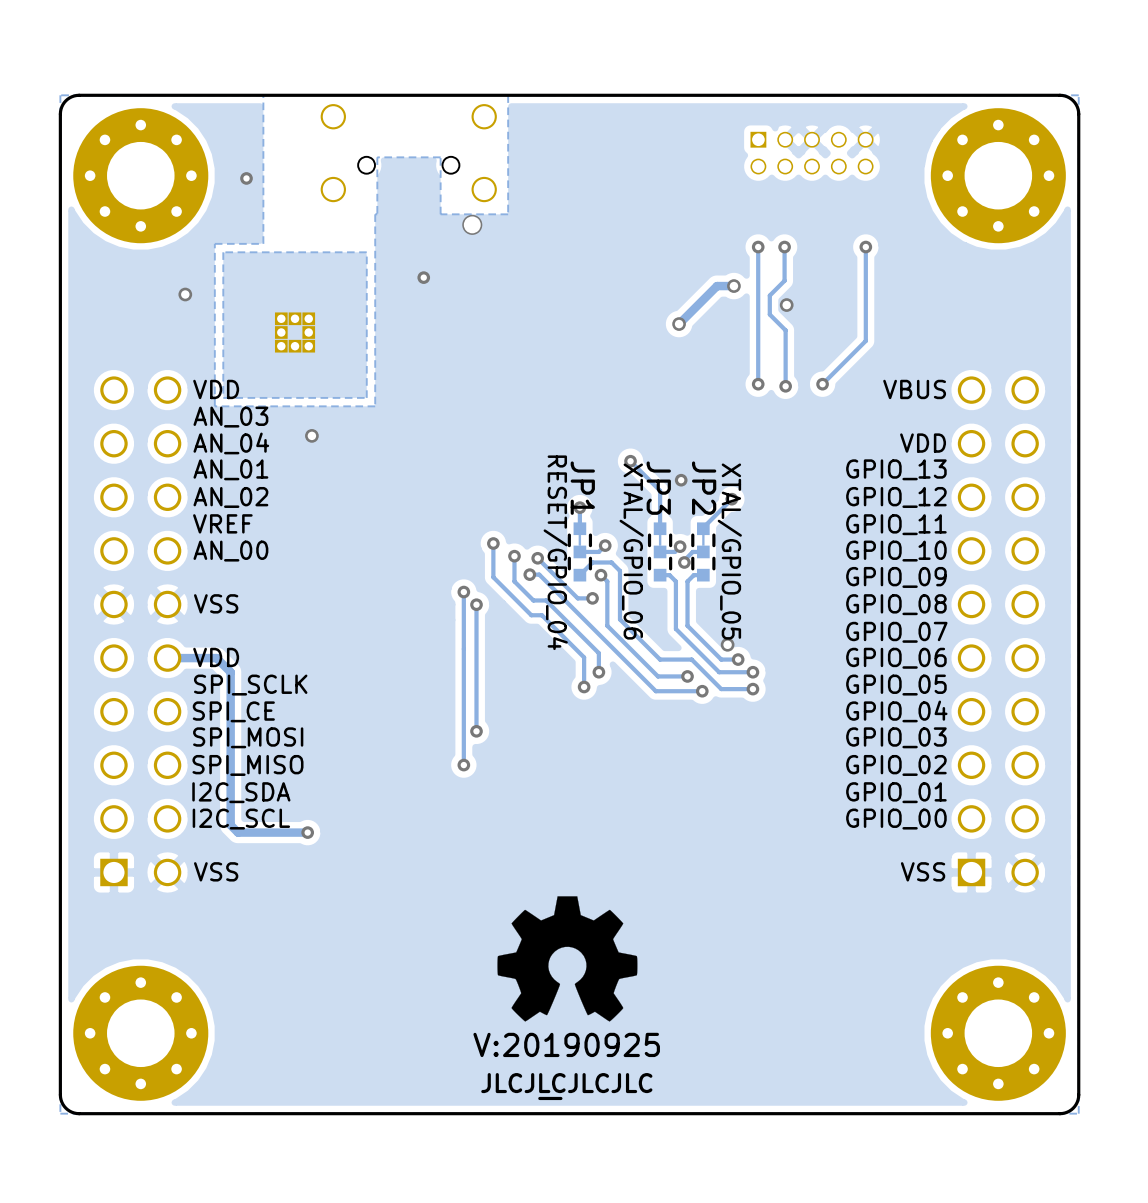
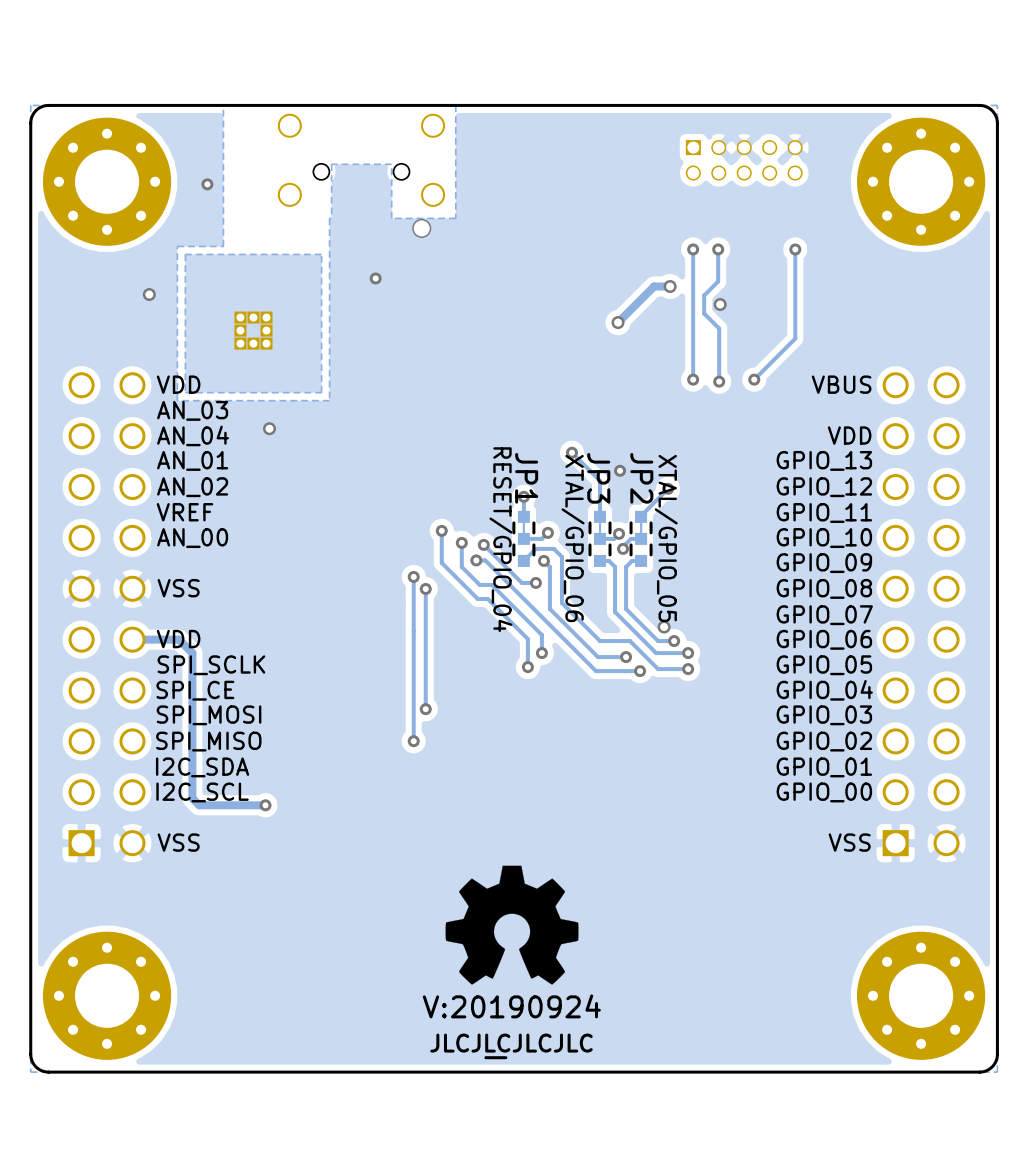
drawing shape: [473, 1032, 660, 1058] -> [422, 994, 601, 1019]

